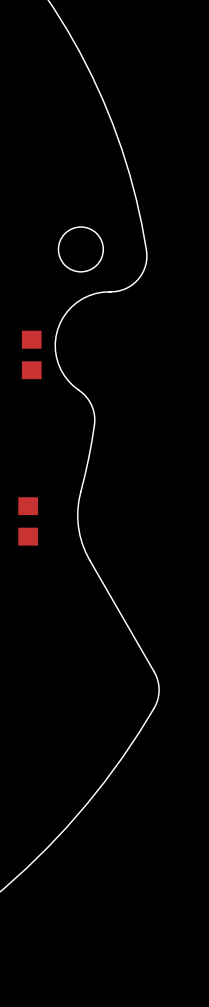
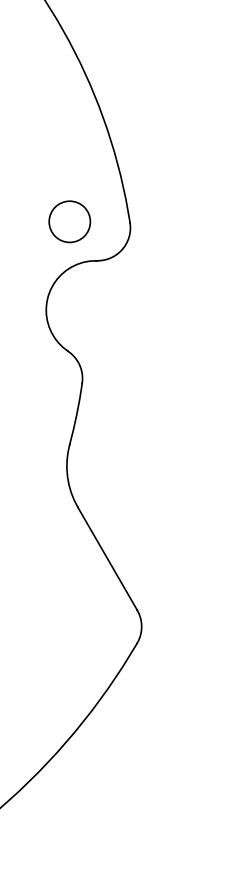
part: (31, 354) -> none
part: (28, 521) -> none

